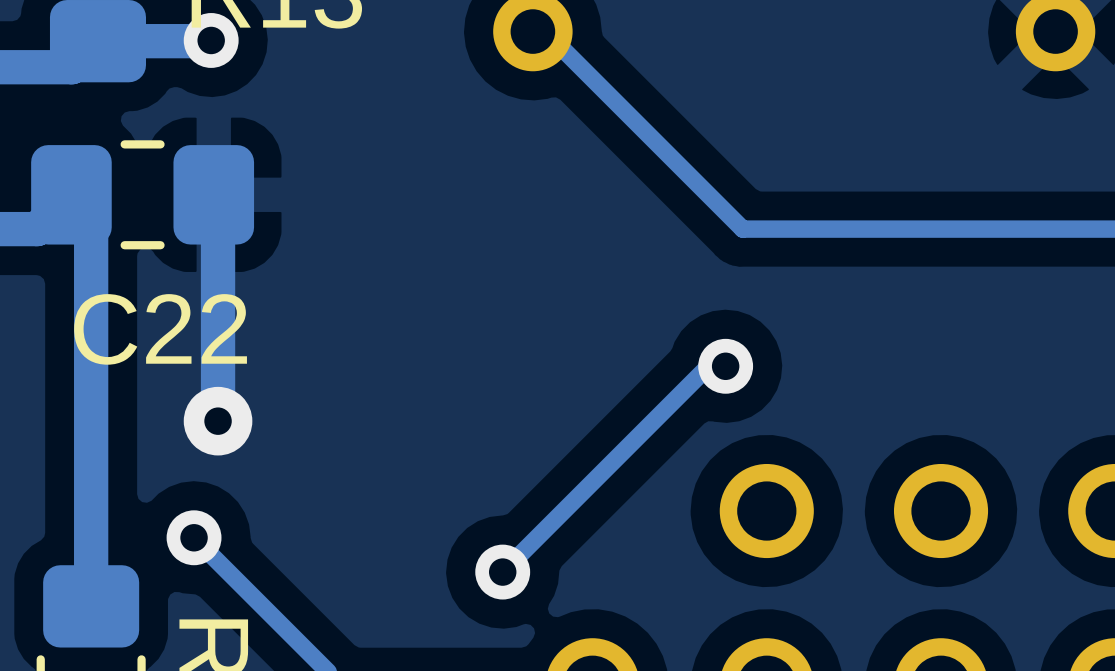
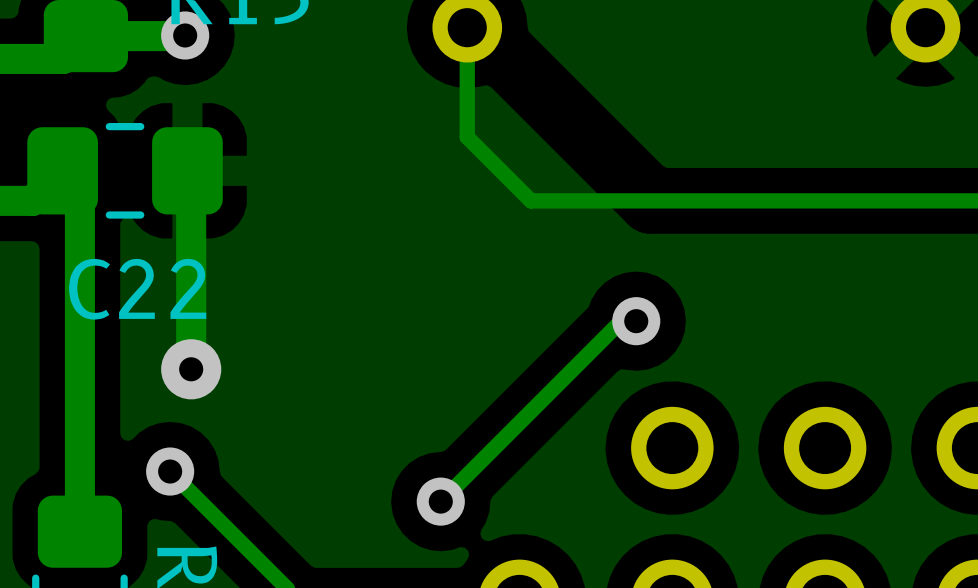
track: (532, 31) (545, 31) (742, 229) -> (467, 27) (467, 137) (531, 200) (651, 200)

